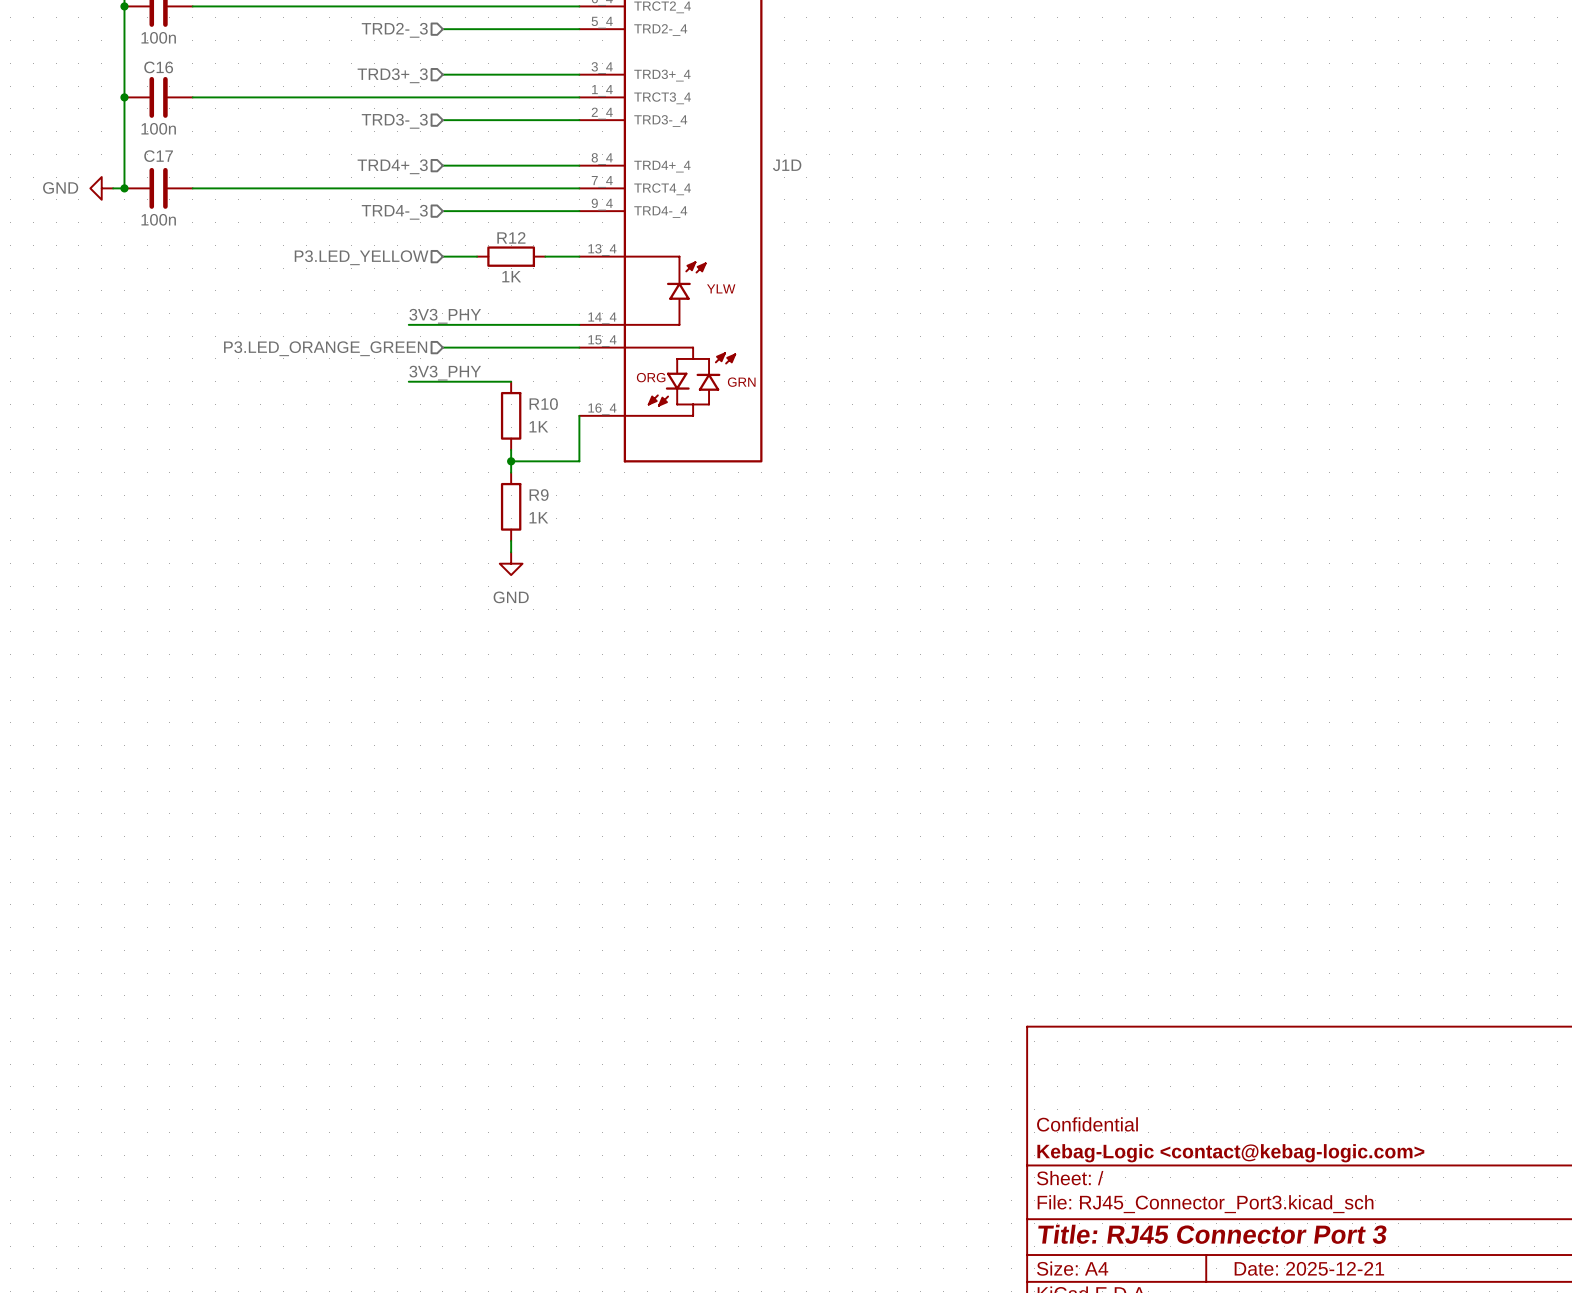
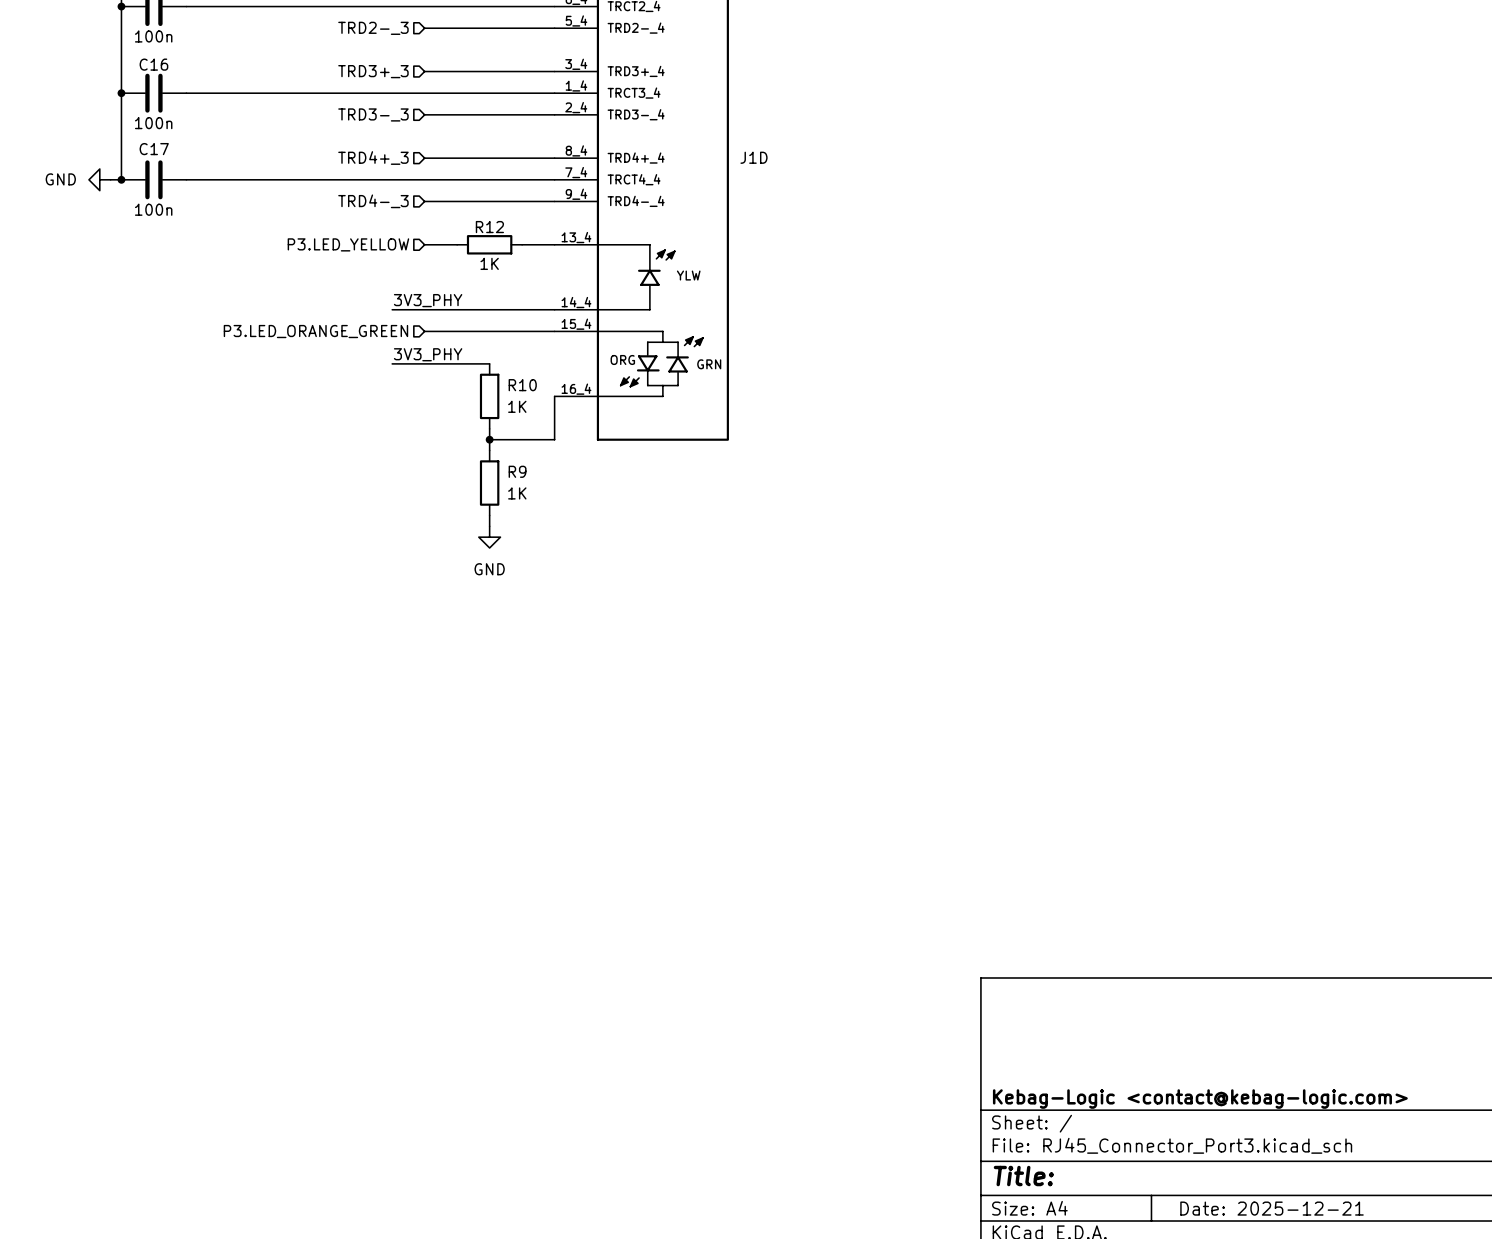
title block: Confidential (1087, 1124) -> none
title block: Title: RJ45 Connector Port 3 (1212, 1234) -> Title: (1023, 1176)

